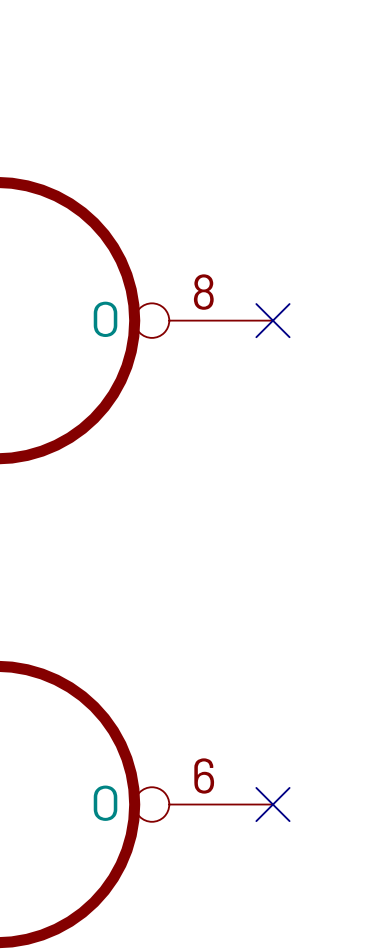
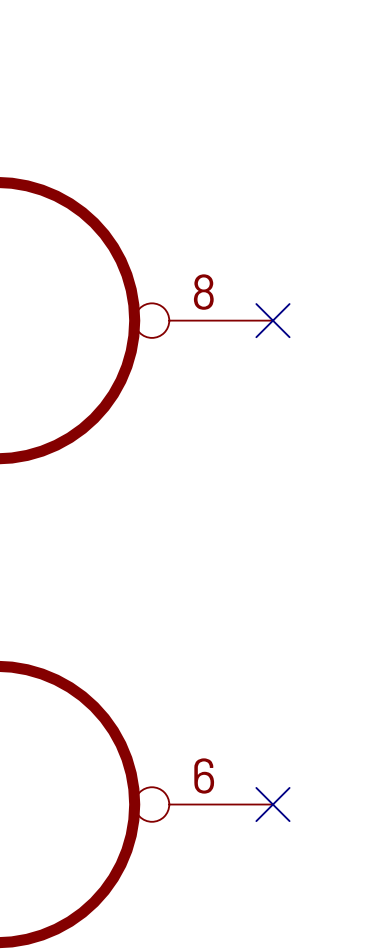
part pin name: O (105, 319) -> none
part pin name: O (105, 803) -> none

